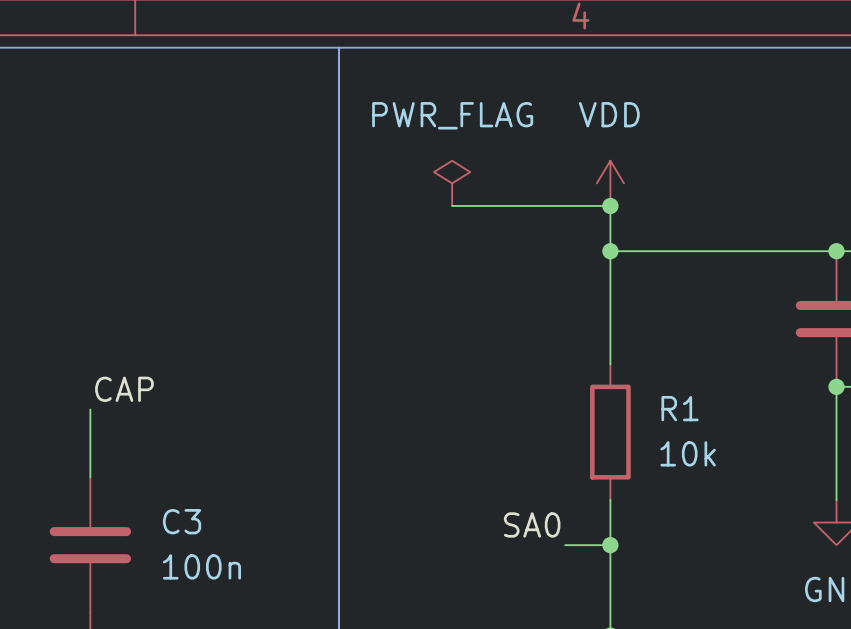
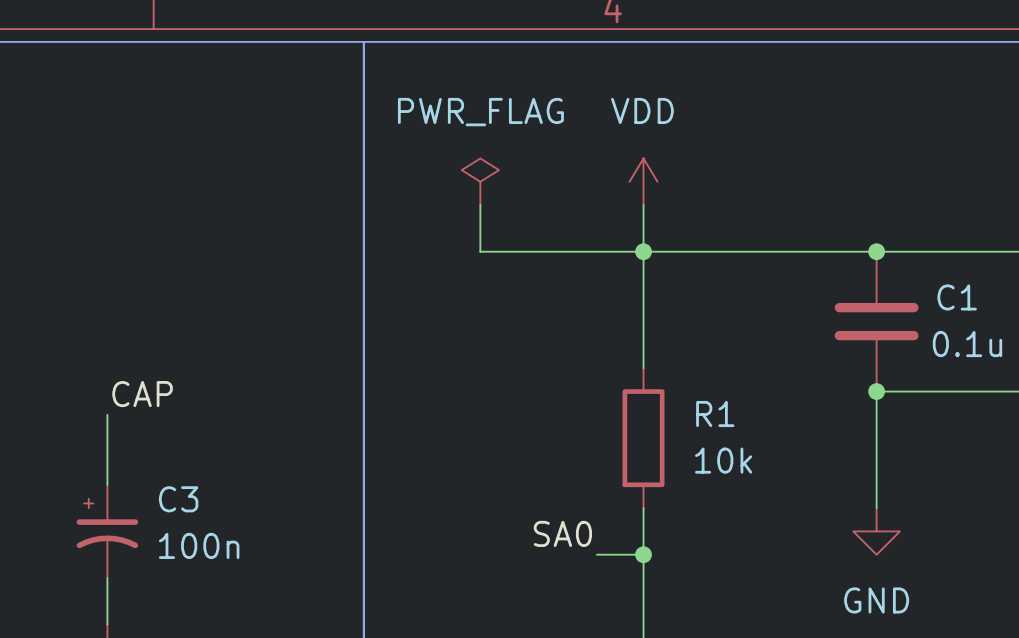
wire: (452, 205) (610, 205) -> (480, 205) (480, 251) (643, 251)
junction: (610, 205) -> none
C3 symbol: [49, 477, 132, 613] -> [76, 484, 139, 579]

